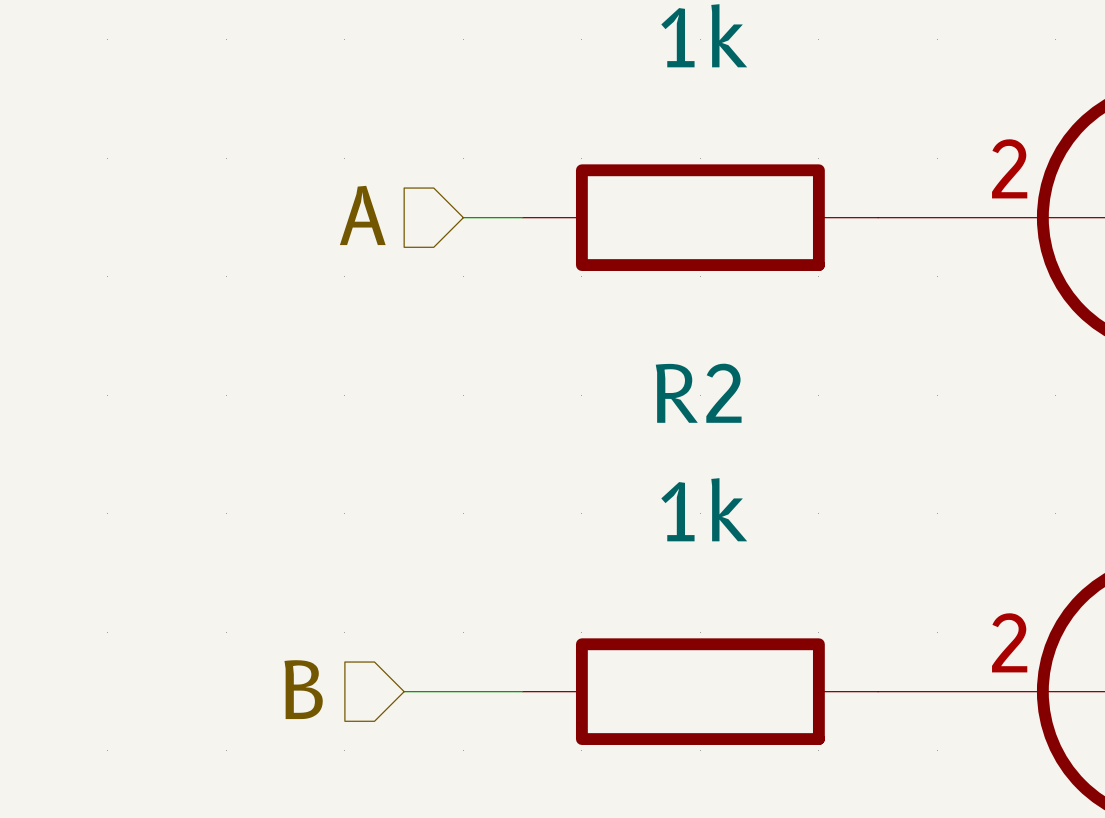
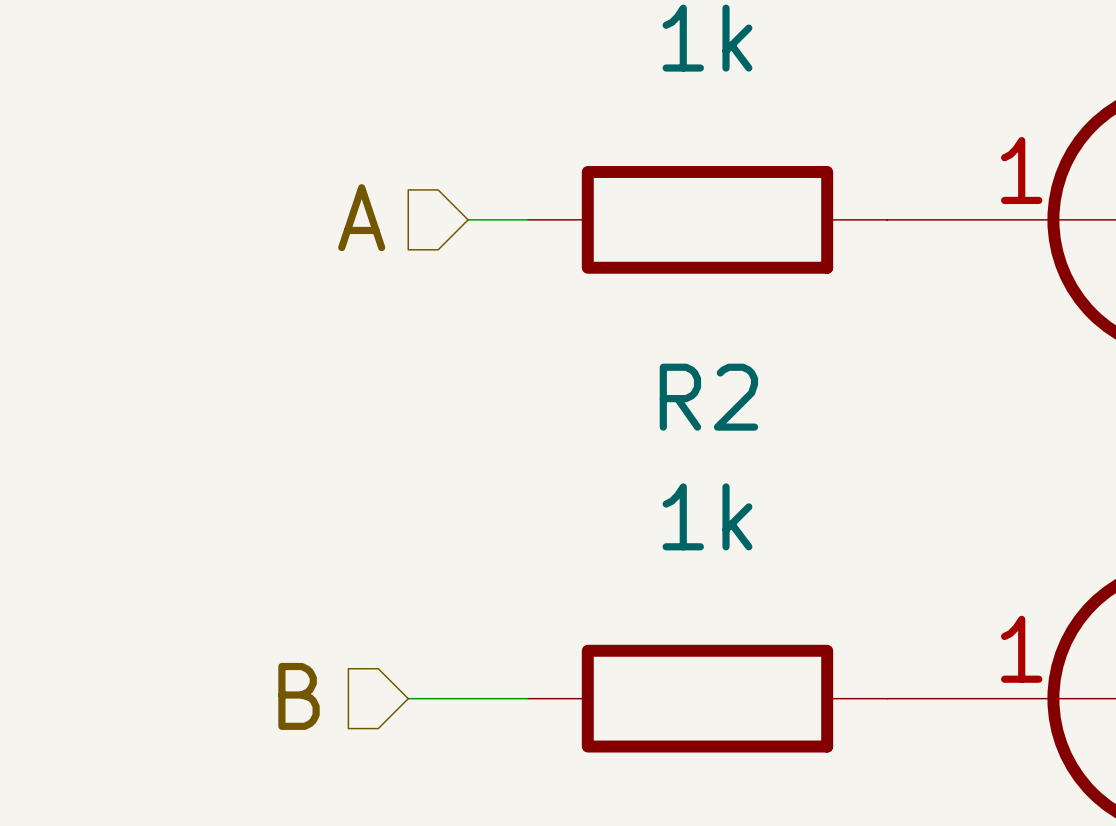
part pin number: 2 (1009, 168) -> 1 (1021, 170)
part pin number: 2 (1009, 642) -> 1 (1021, 649)

